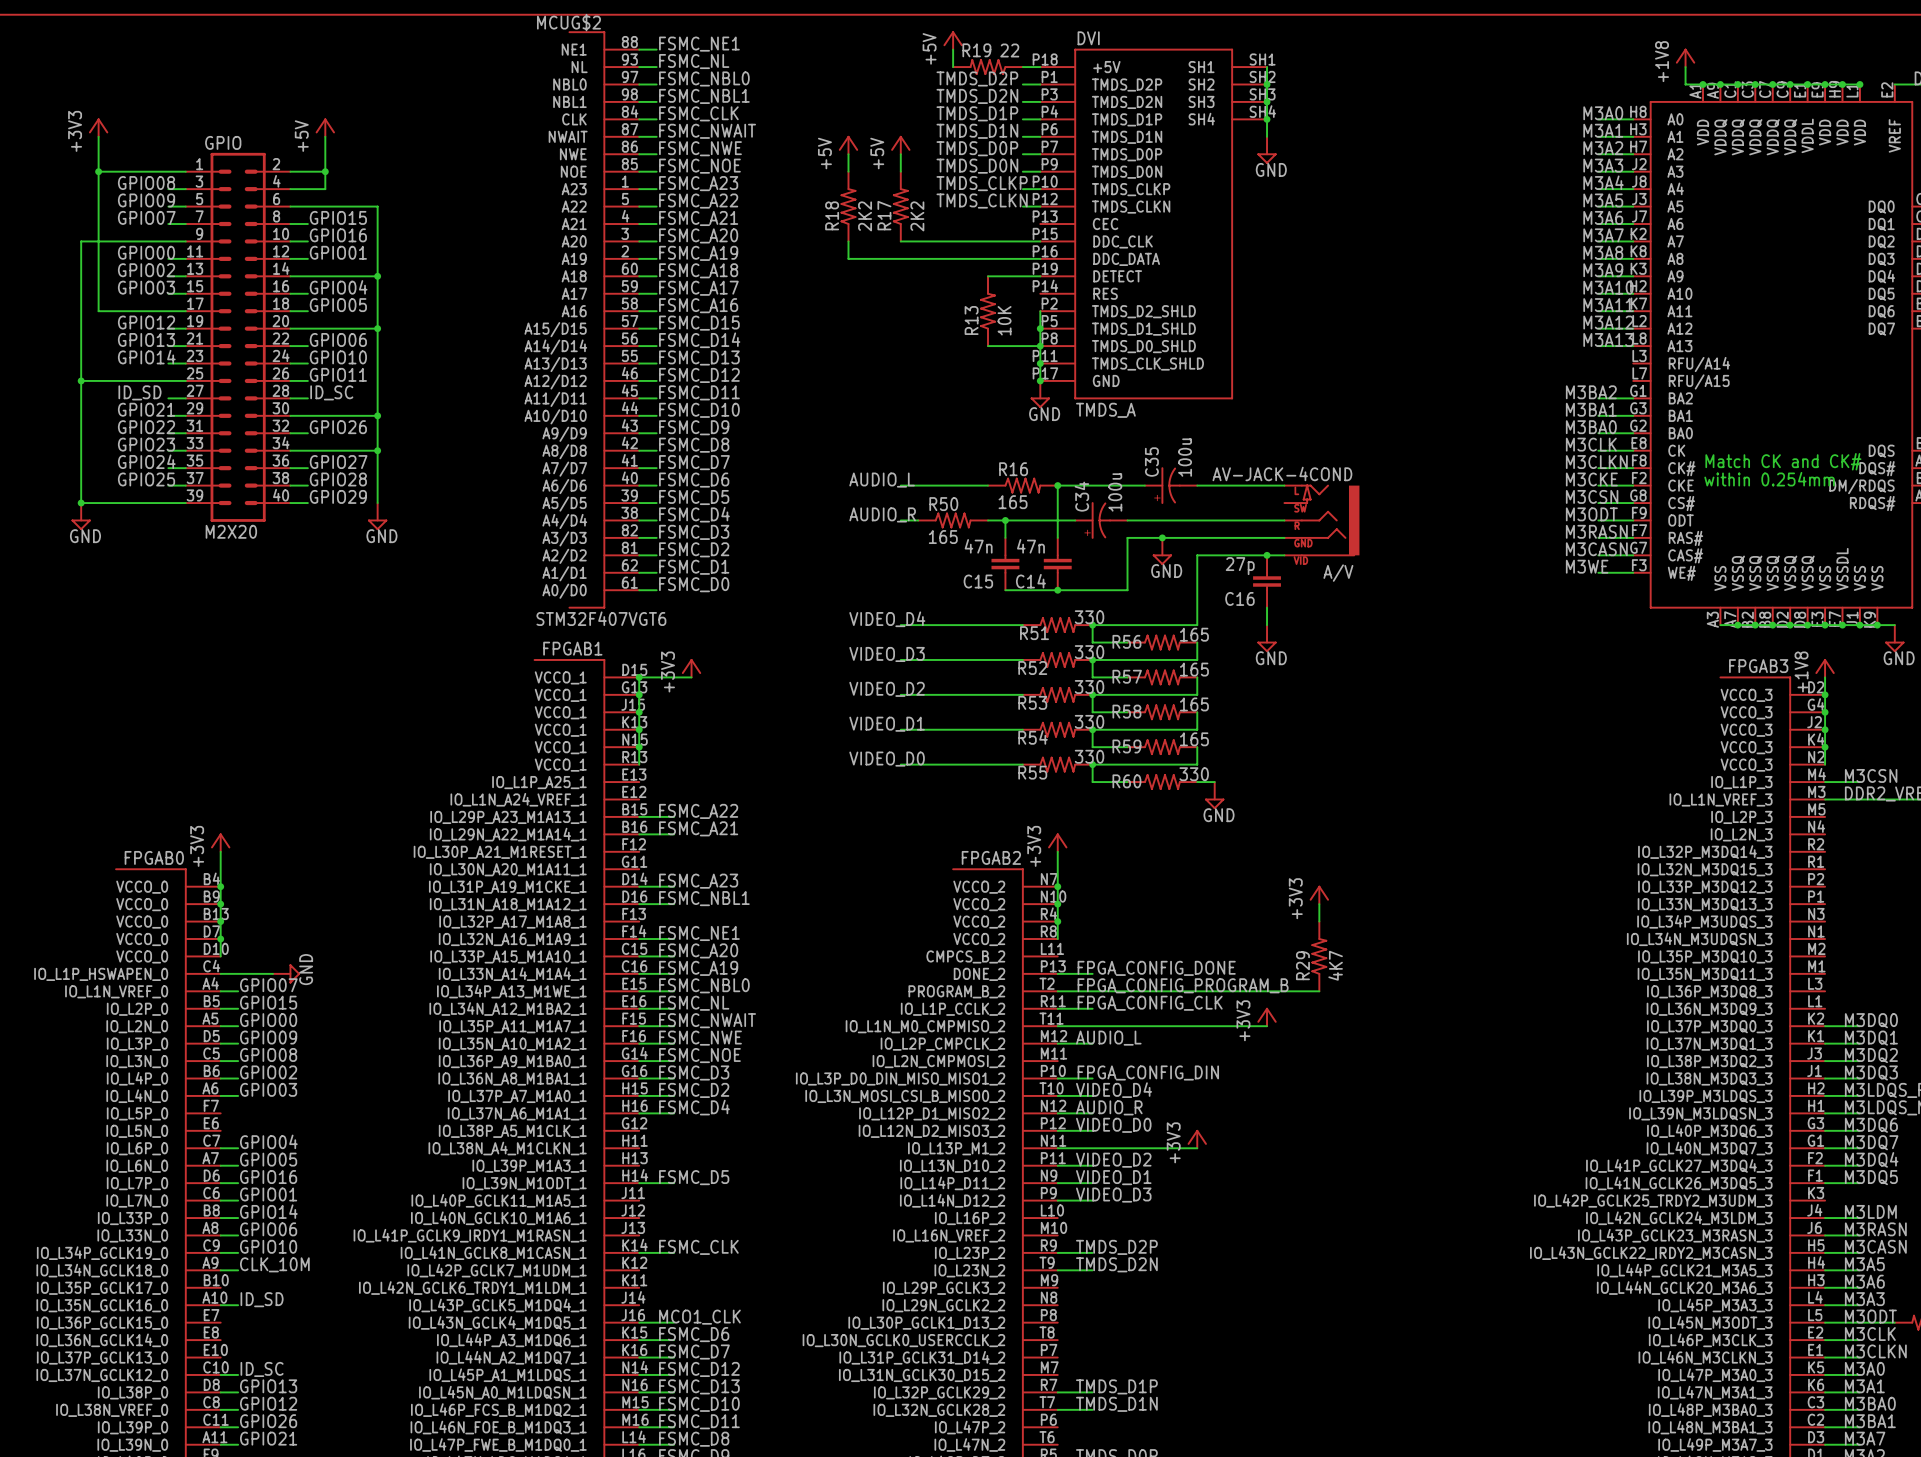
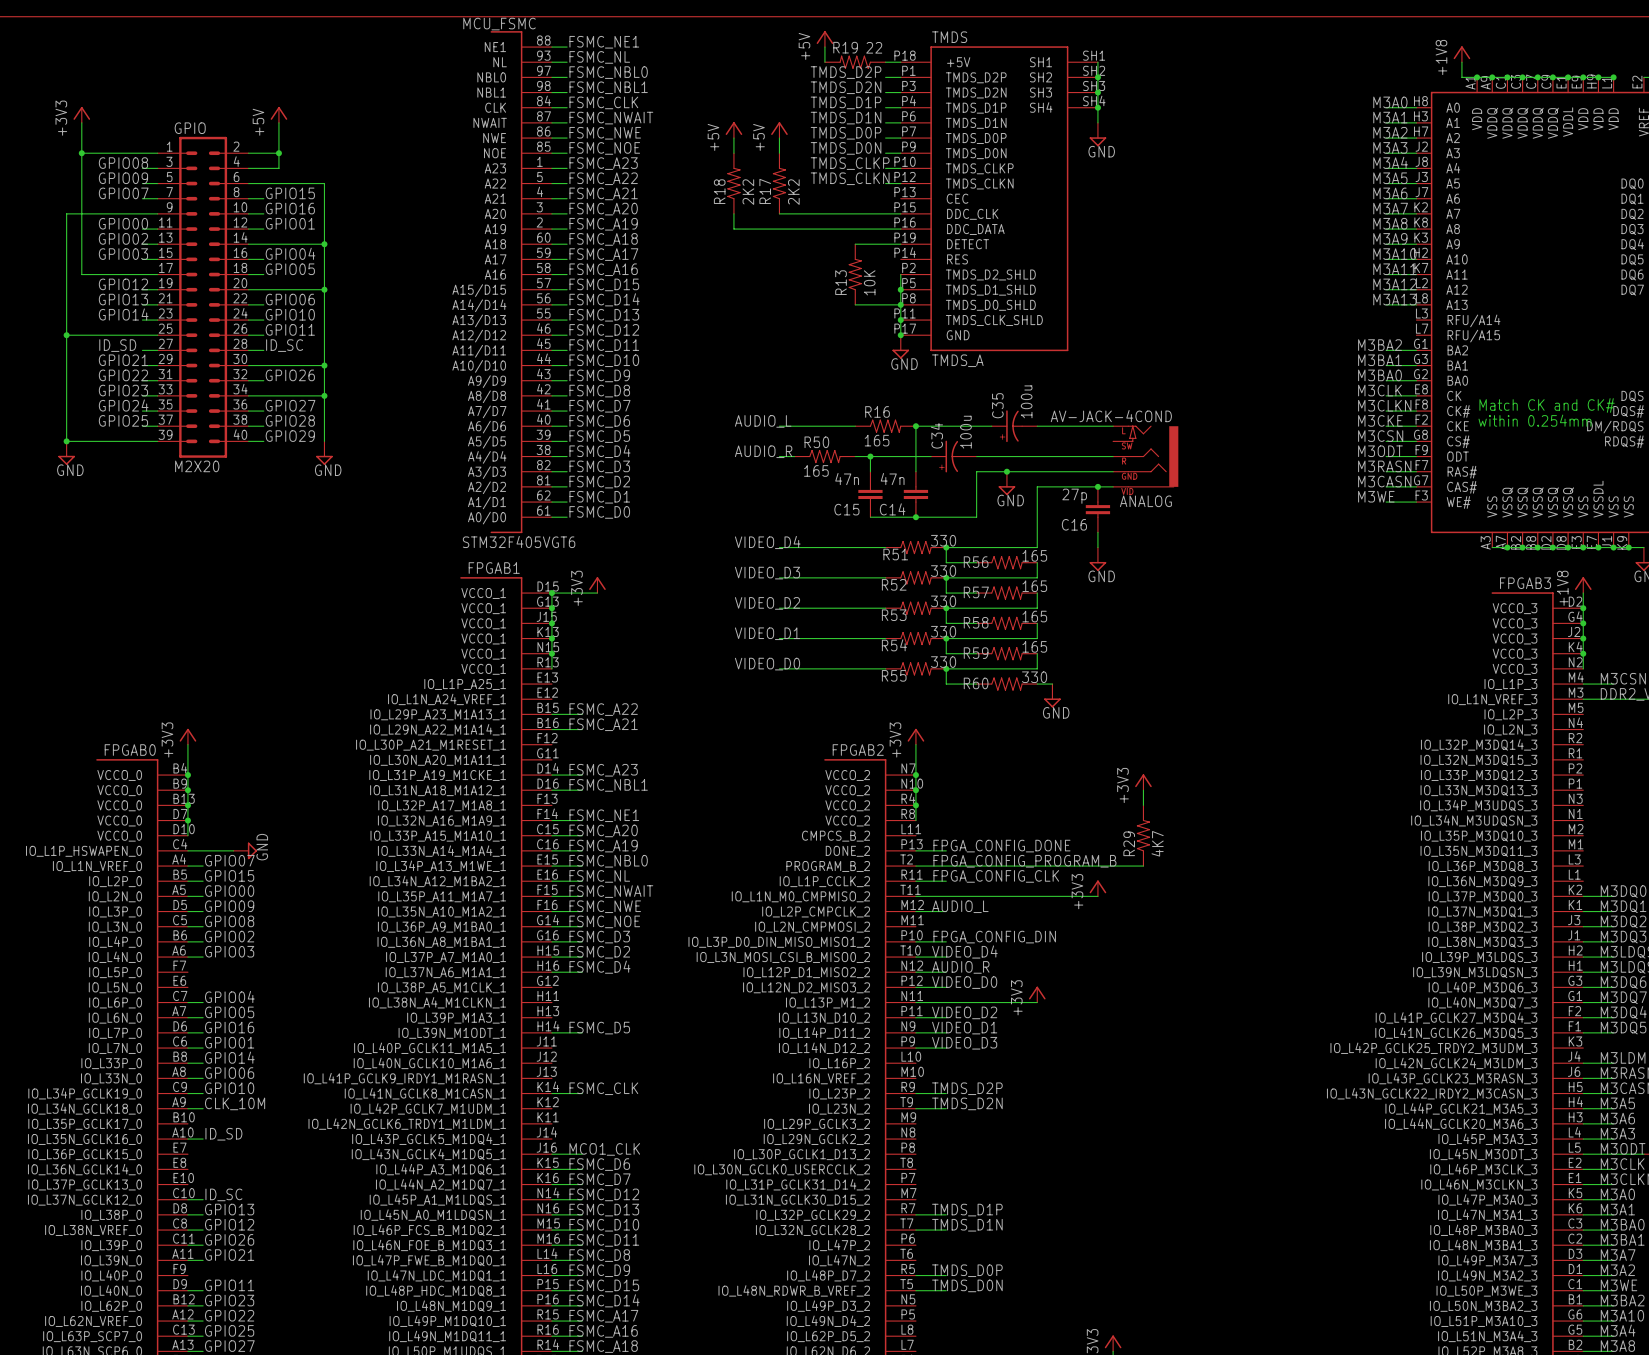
MCUG$2 name: MCUG$2 (568, 22) -> MCU_FSMC (499, 24)
DVI name: DVI (1088, 38) -> TMDS (949, 37)
A/V name: A/V (1338, 573) -> ANALOG (1145, 501)
MCUG$2 value: STM32F407VGT6 (601, 618) -> STM32F405VGT6 (519, 541)

